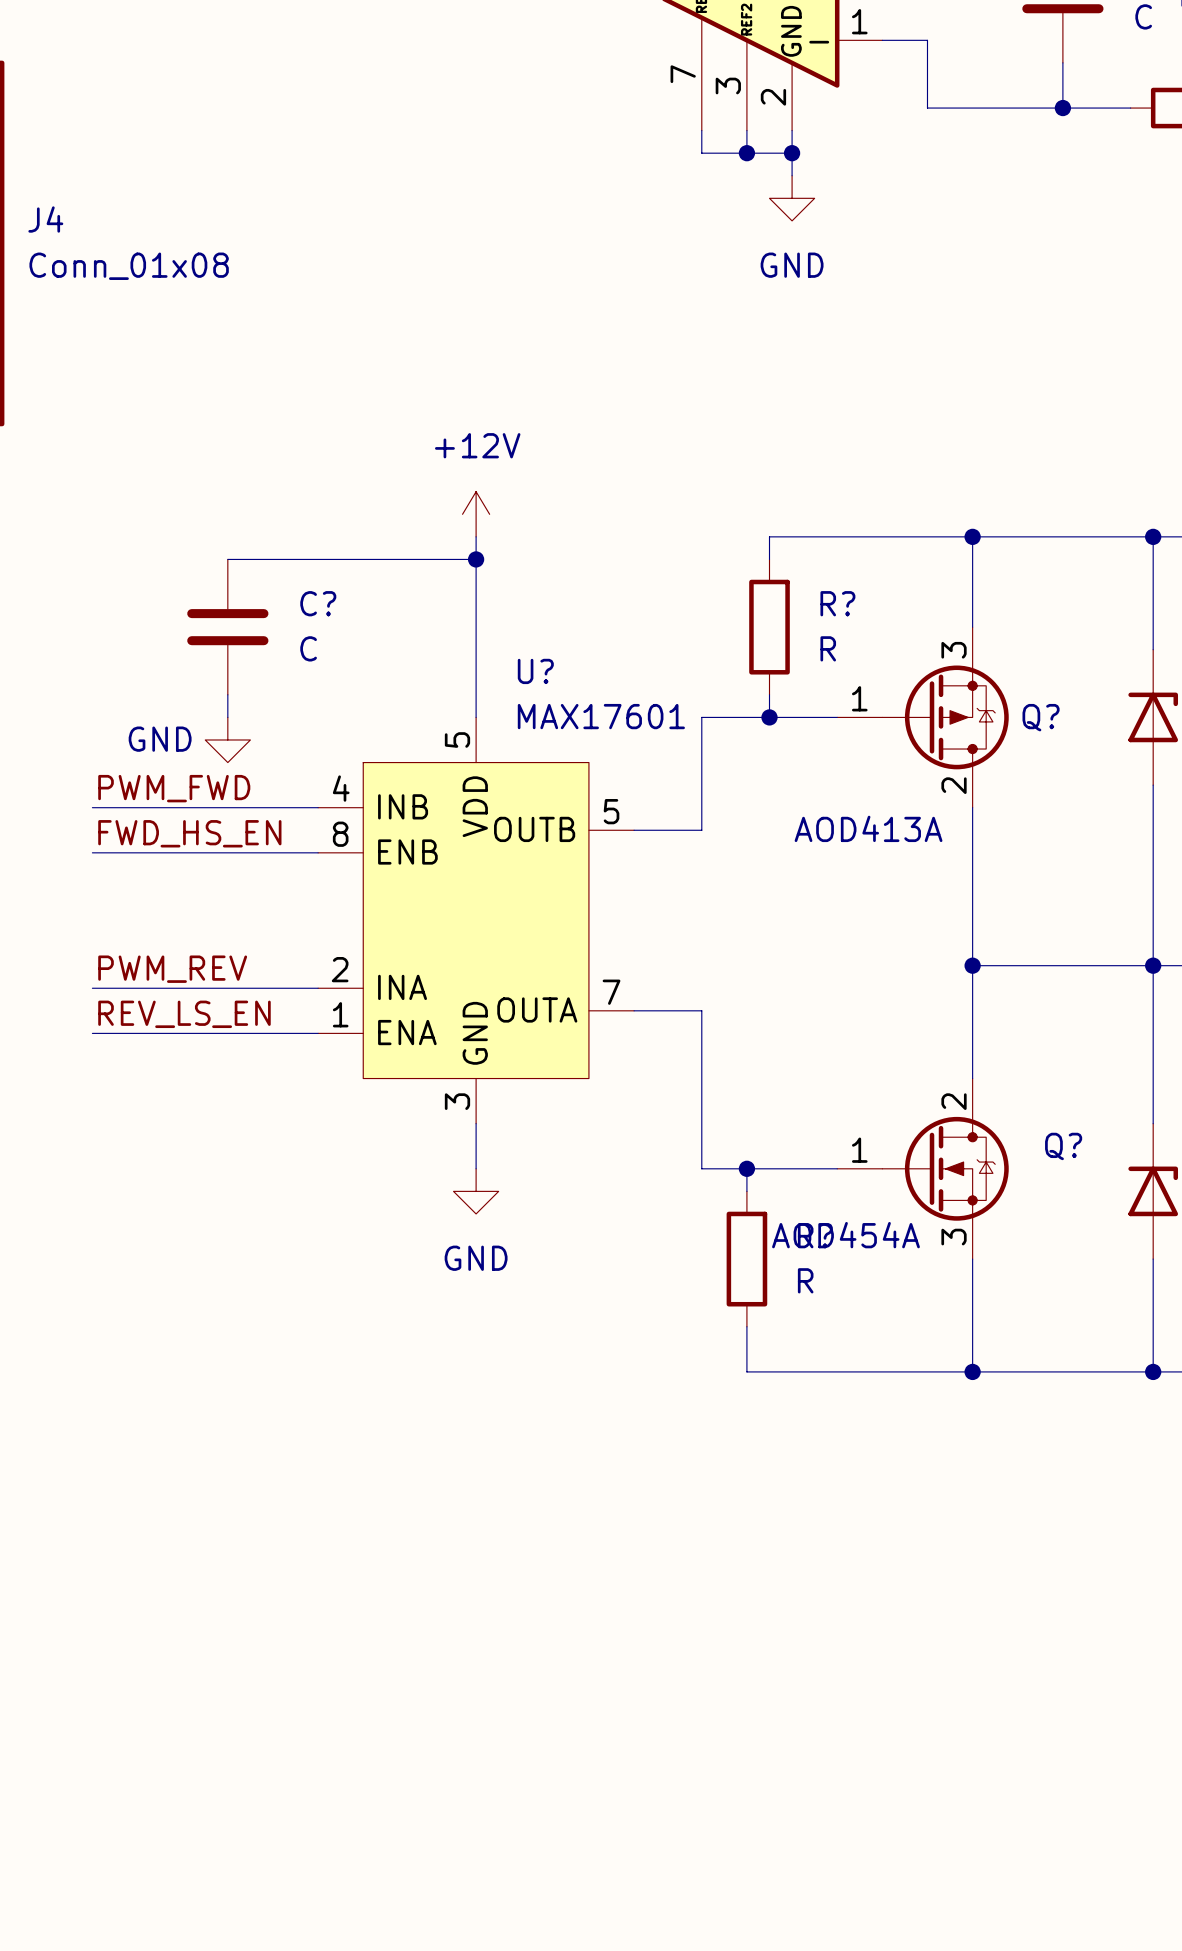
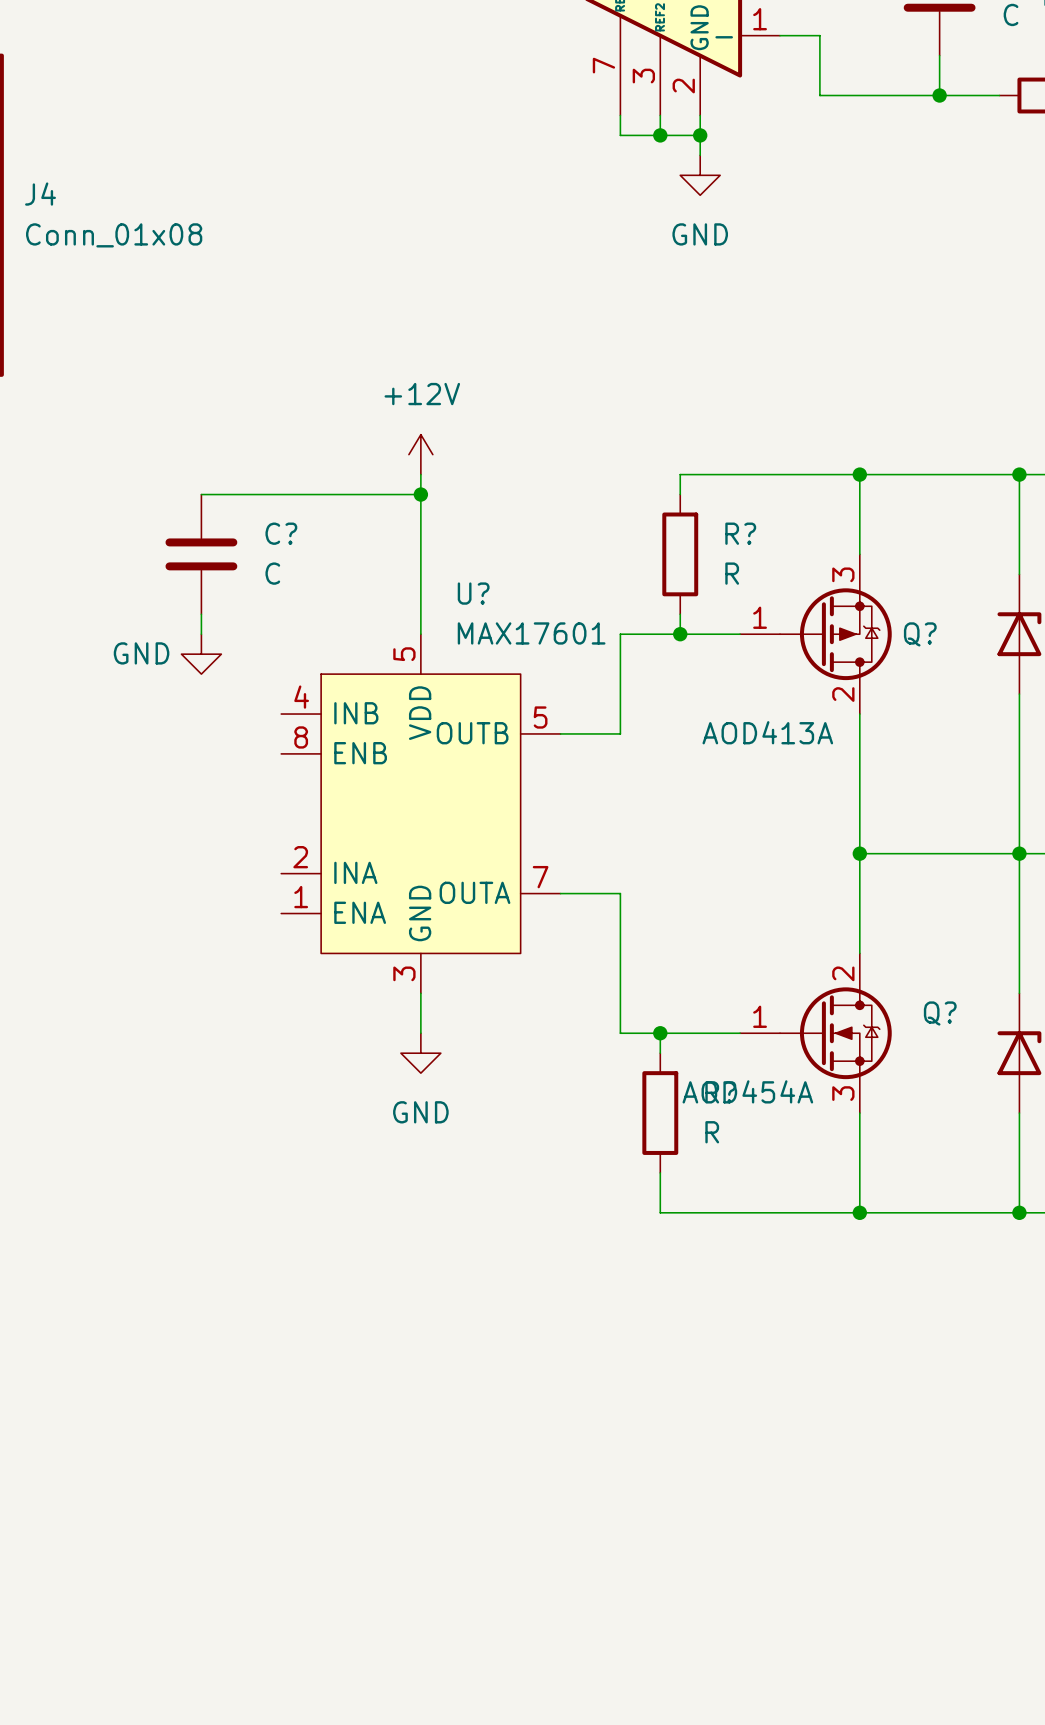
label: PWM_FWD (174, 788) -> none
wire: (92, 807) (318, 807) -> none
label: FWD_HS_EN (189, 833) -> none
wire: (92, 852) (318, 852) -> none
label: PWM_REV (172, 969) -> none
wire: (92, 988) (318, 988) -> none
label: REV_LS_EN (184, 1014) -> none
wire: (92, 1033) (318, 1033) -> none

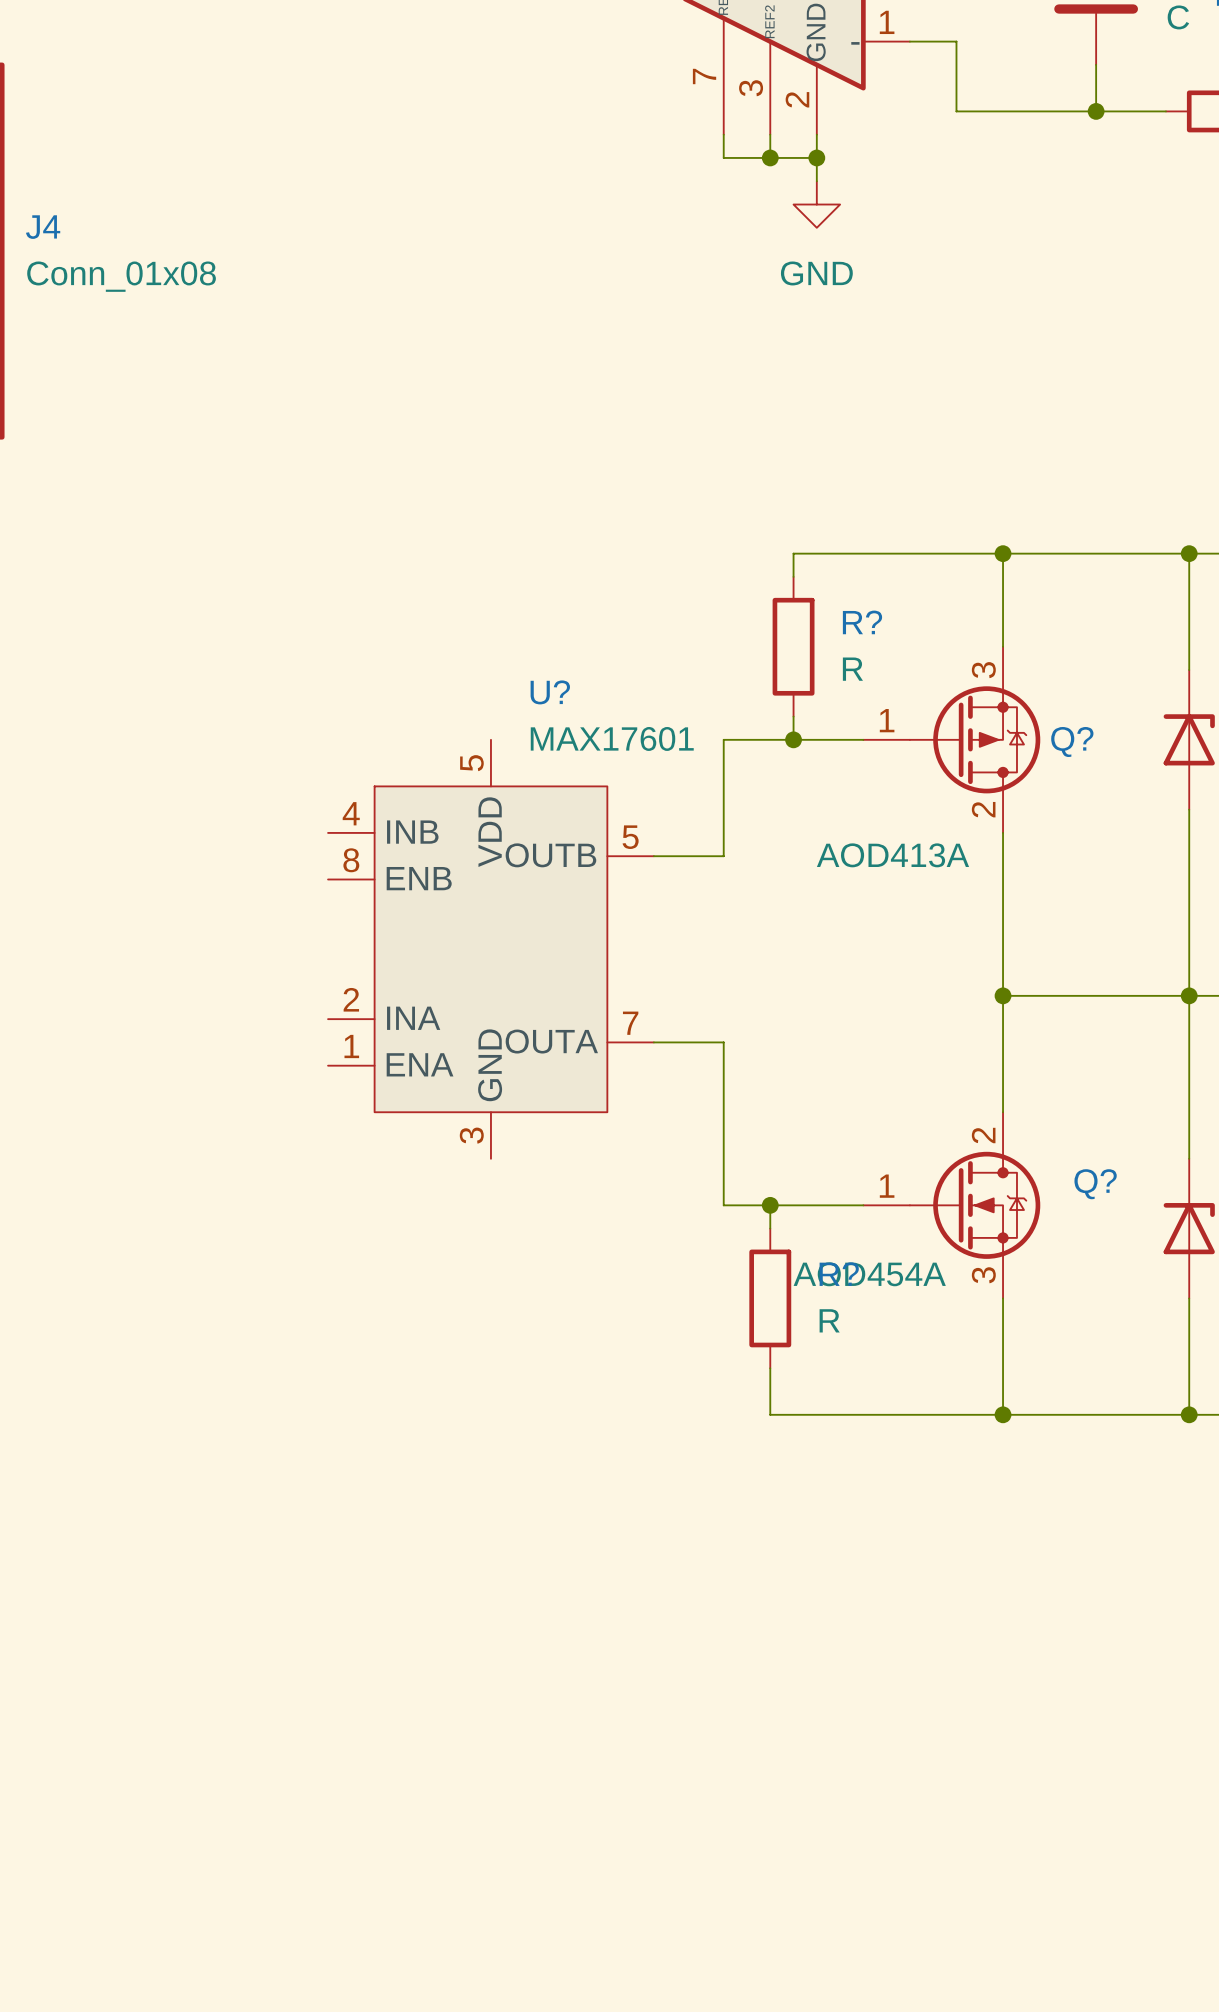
power symbol: +12V (420, 454) -> none
wire: (420, 474) (420, 634) -> none
wire: (201, 494) (420, 494) -> none
junction: (420, 494) -> none
C?: C (201, 554) -> none
wire: (201, 614) (201, 634) -> none
power symbol: GND (201, 654) -> none
wire: (420, 993) (420, 1033) -> none
power symbol: GND (420, 1053) -> none

